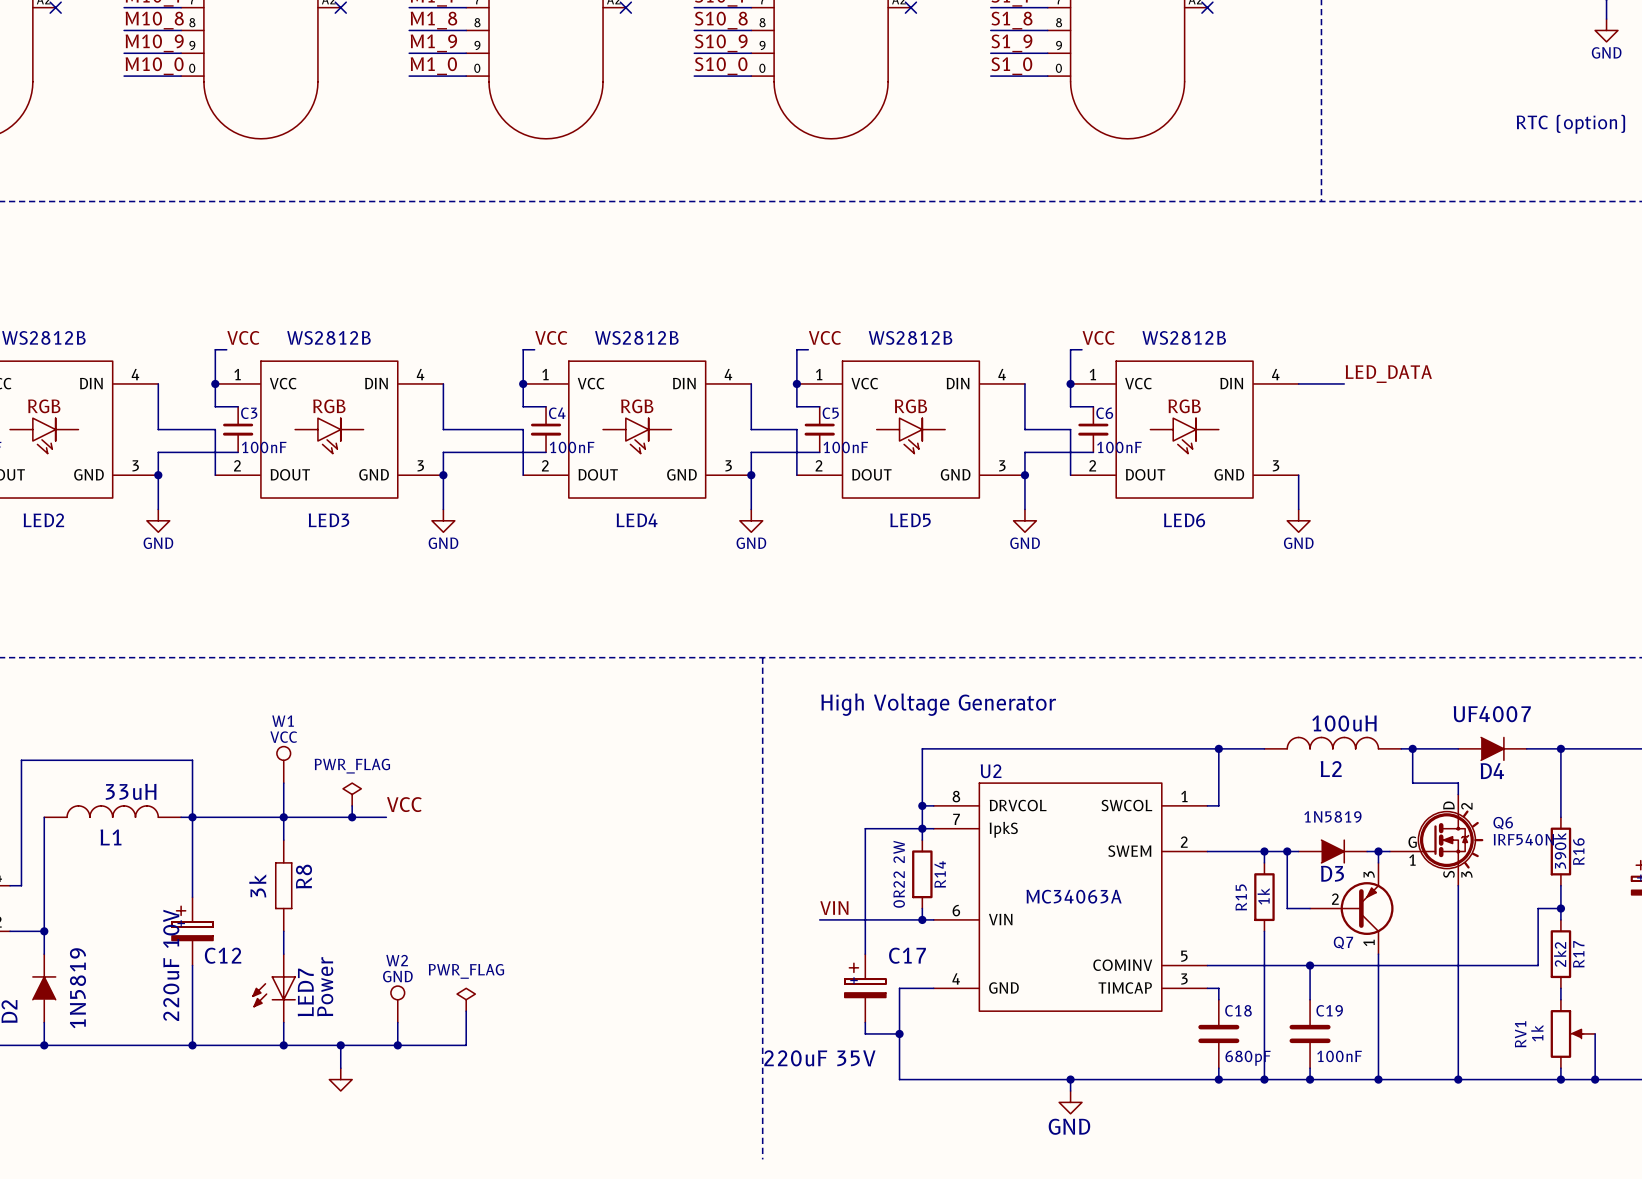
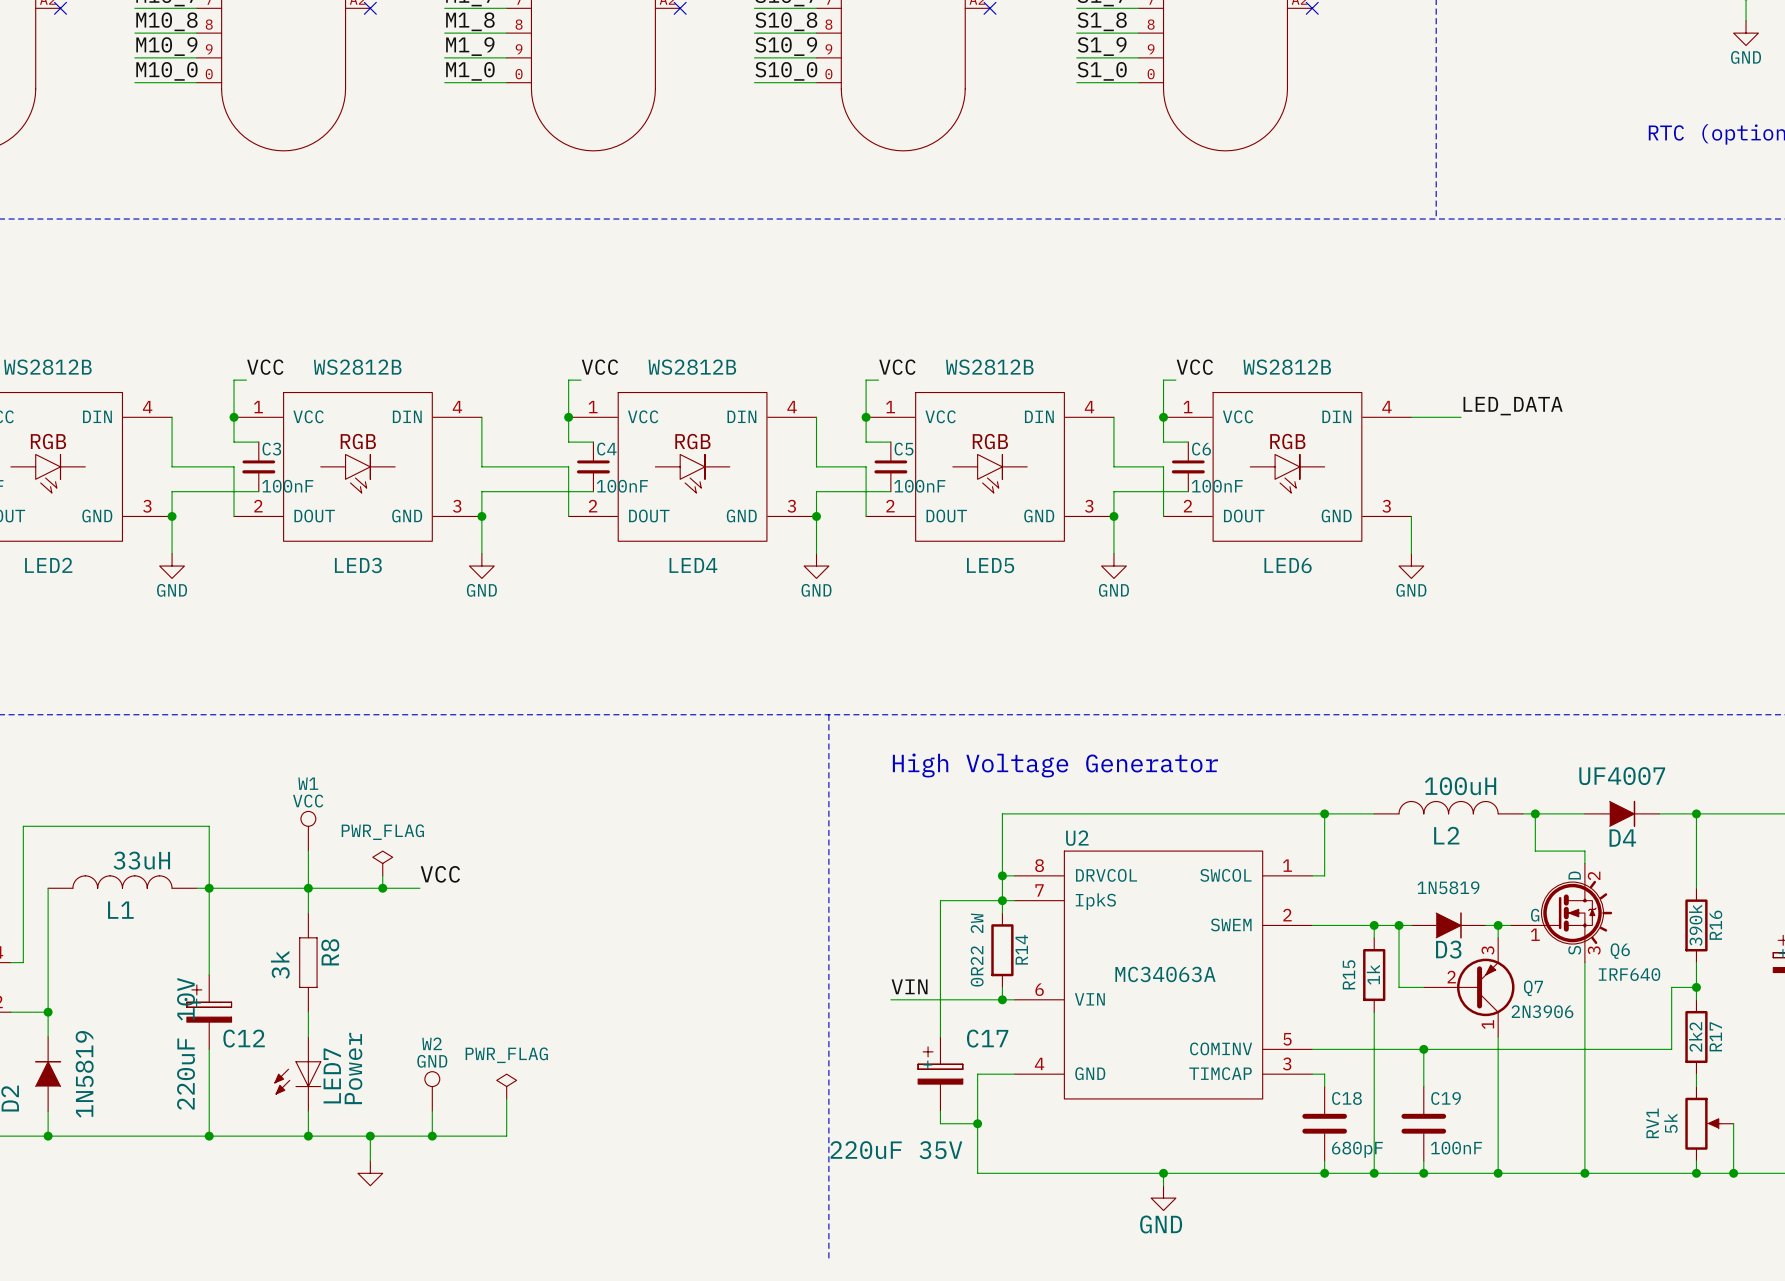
Q6 name position: Q6 (1503, 823) -> Q6 (1620, 951)
Q6 value: IRF540N (1523, 839) -> IRF640 (1629, 974)
Q7 value: none -> 2N3906 (1542, 1011)
Q7 name position: Q7 (1343, 942) -> Q7 (1533, 988)
RV1 value: 1k (1537, 1033) -> 5k (1670, 1123)

